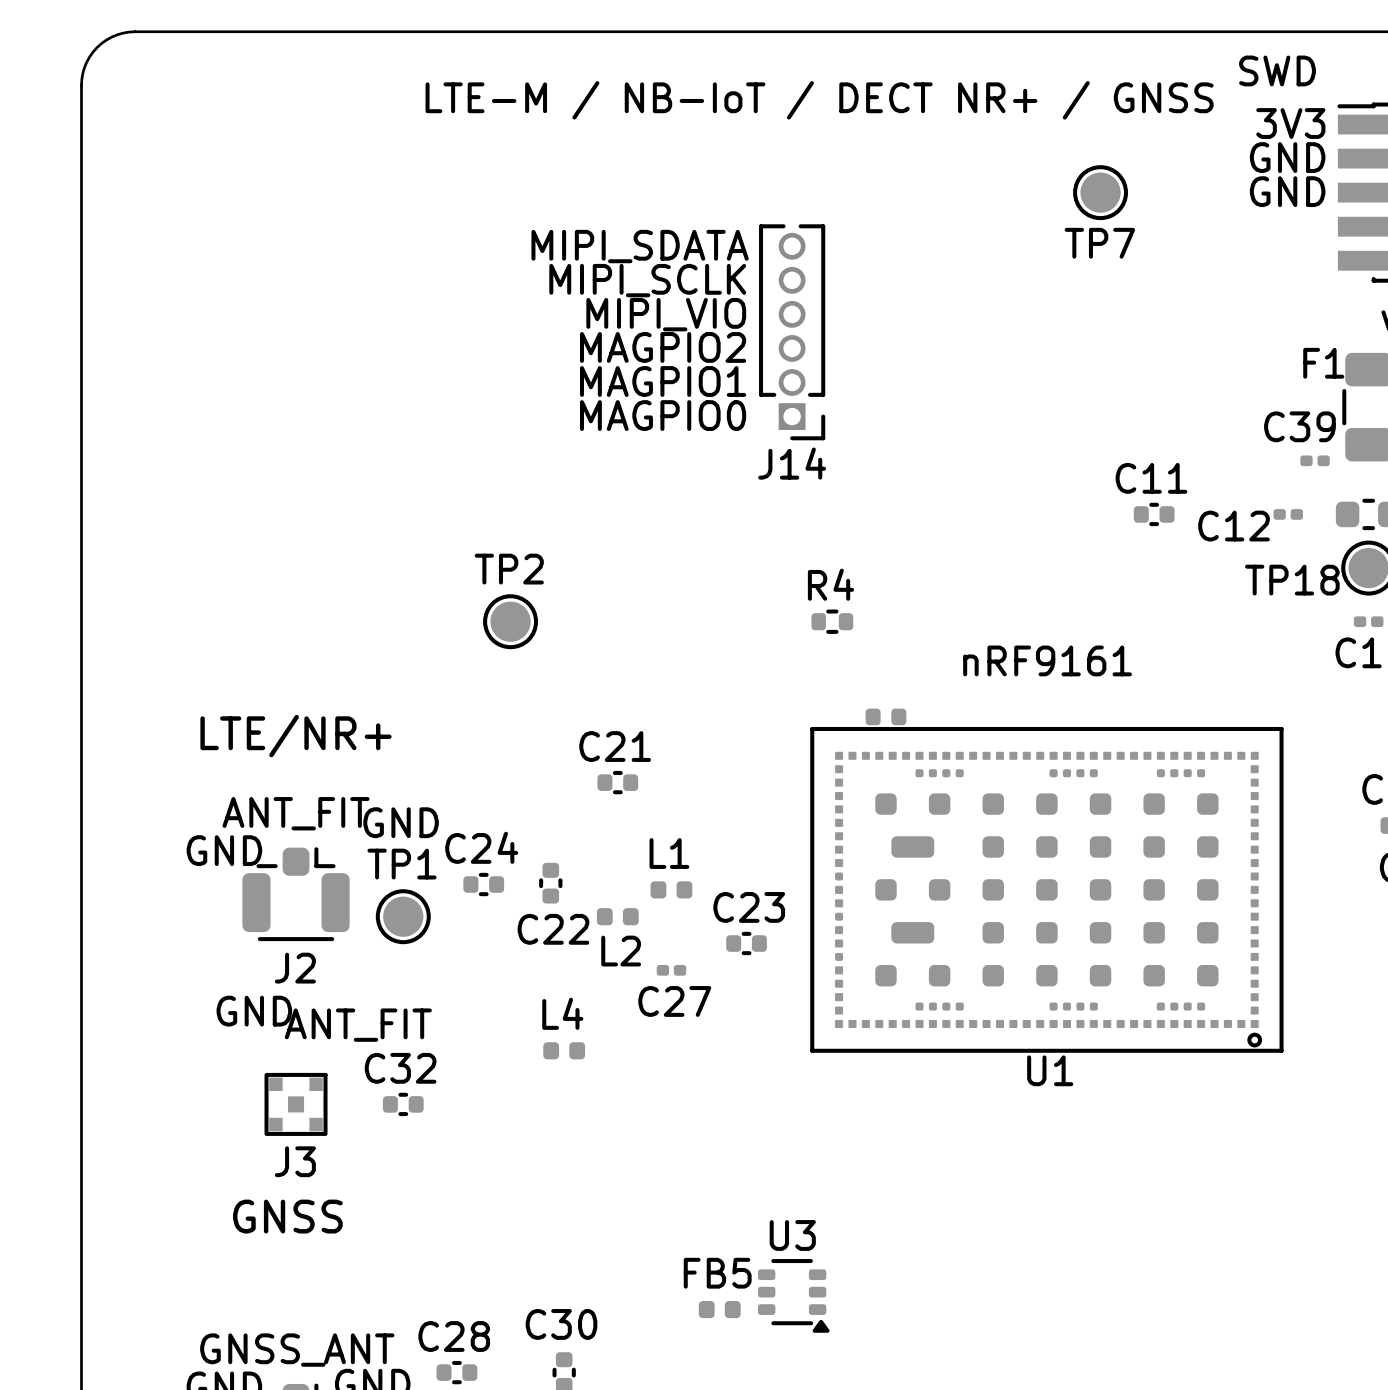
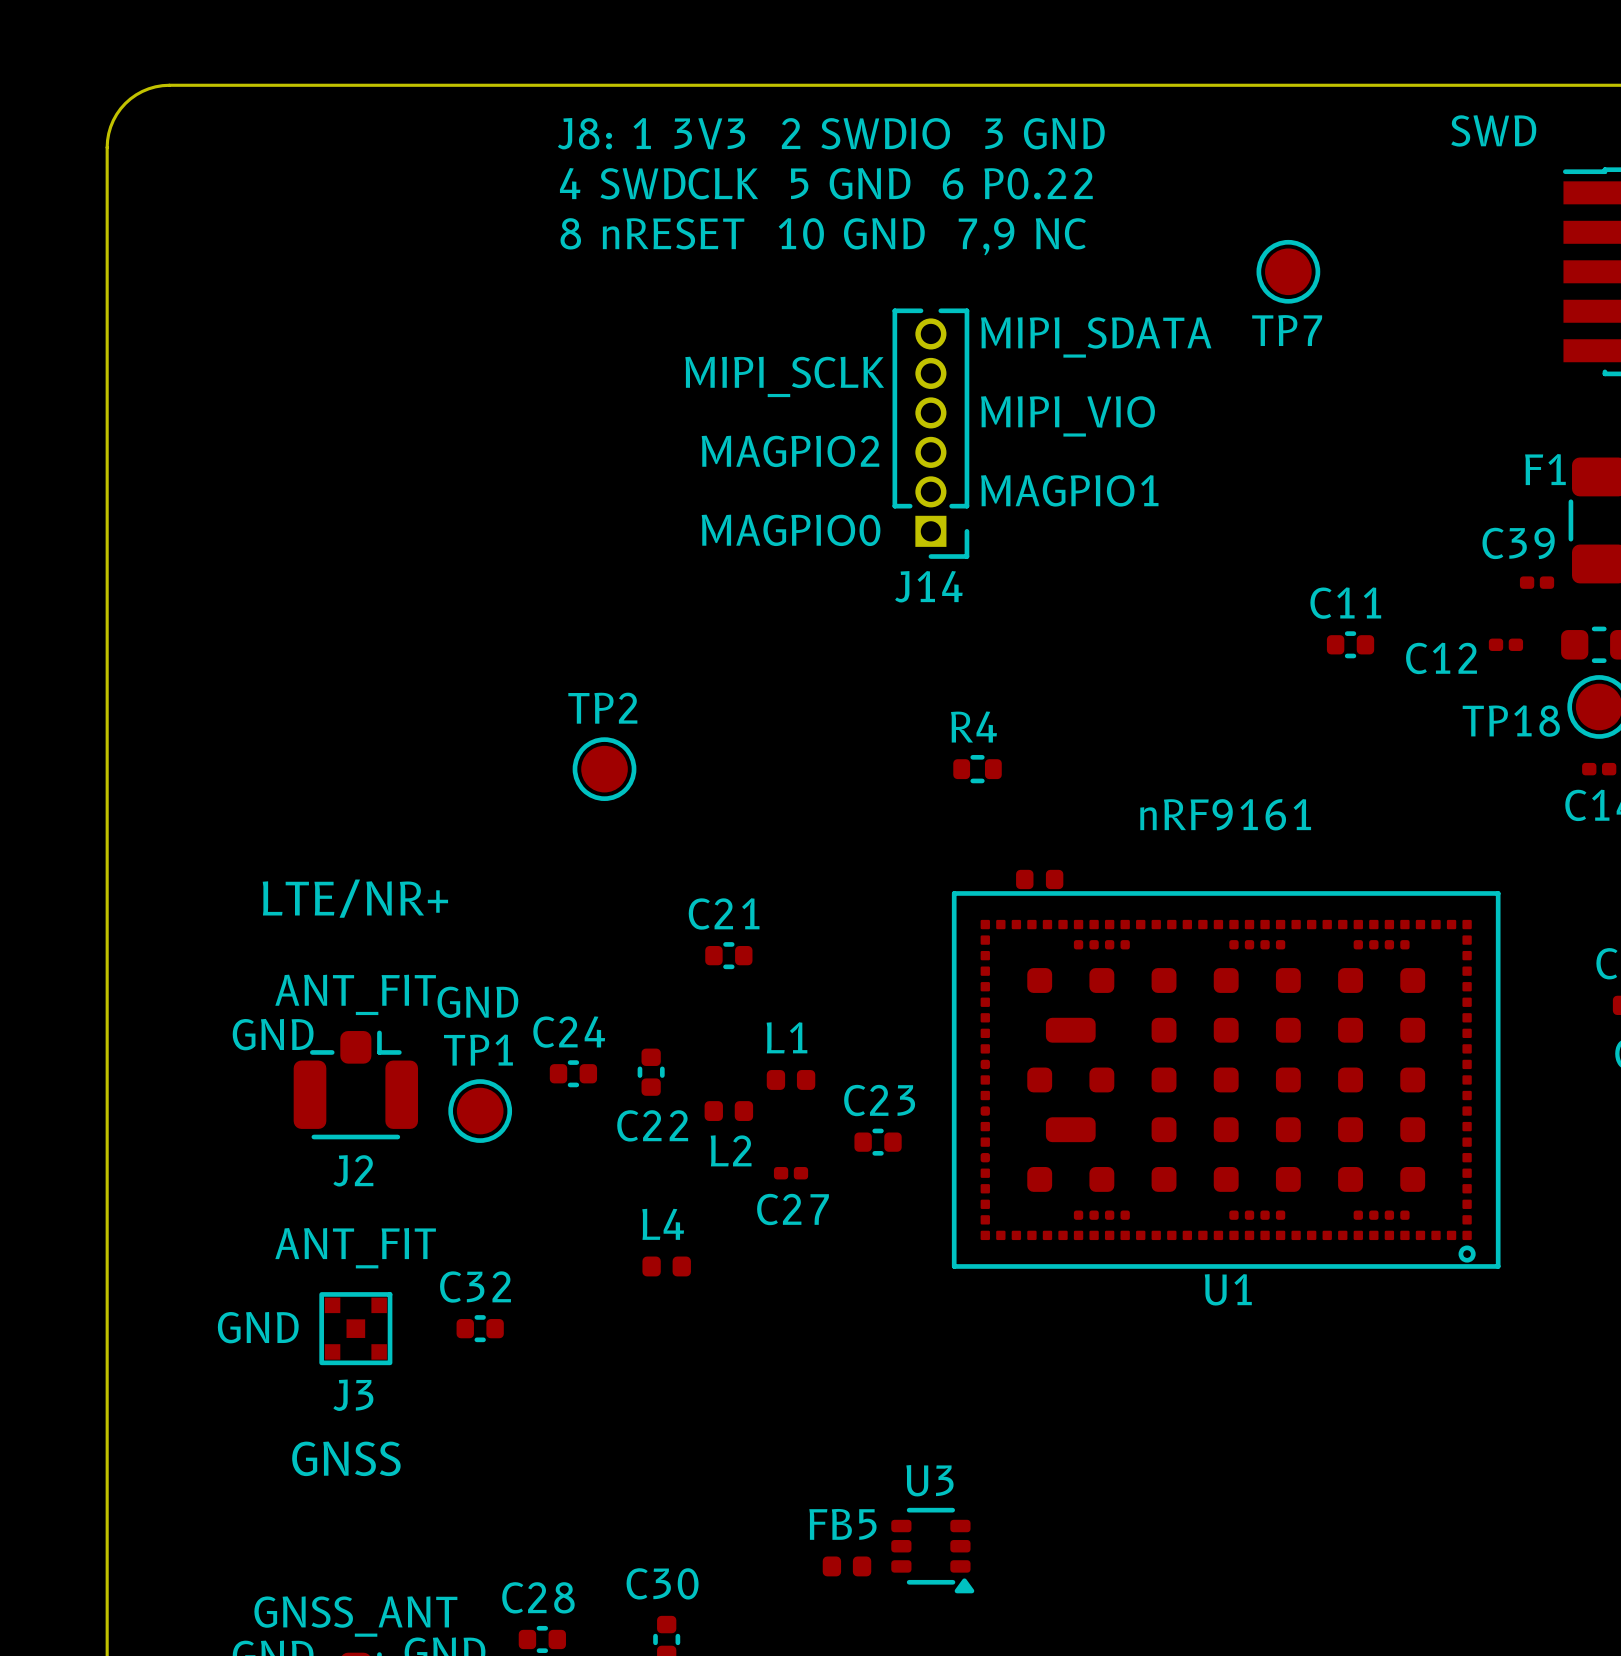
text: none -> J8: 1 3V3 2 SWDIO 3 GND (831, 133)
text: LTE-M / NB-IoT / DECT NR+ / GNSS (819, 100) -> none
text: none -> 4 SWDCLK 5 GND 6 P0.22 (826, 183)
text: 3V3 (1290, 123) -> none
text: GND (1287, 157) -> none
text: none -> 8 nRESET 10 GND 7,9 NC (823, 236)
text: GND (1287, 191) -> none
text position: MIPI_SDATA (640, 246) -> MIPI_SDATA (1096, 337)
text position: MIPI_VIO (666, 314) -> MIPI_VIO (1068, 416)
text position: MAGPIO1 (663, 381) -> MAGPIO1 (1069, 490)
text position: GND (254, 1011) -> GND (258, 1327)
text position: ANT_FIT (358, 1025) -> ANT_FIT (355, 1248)

